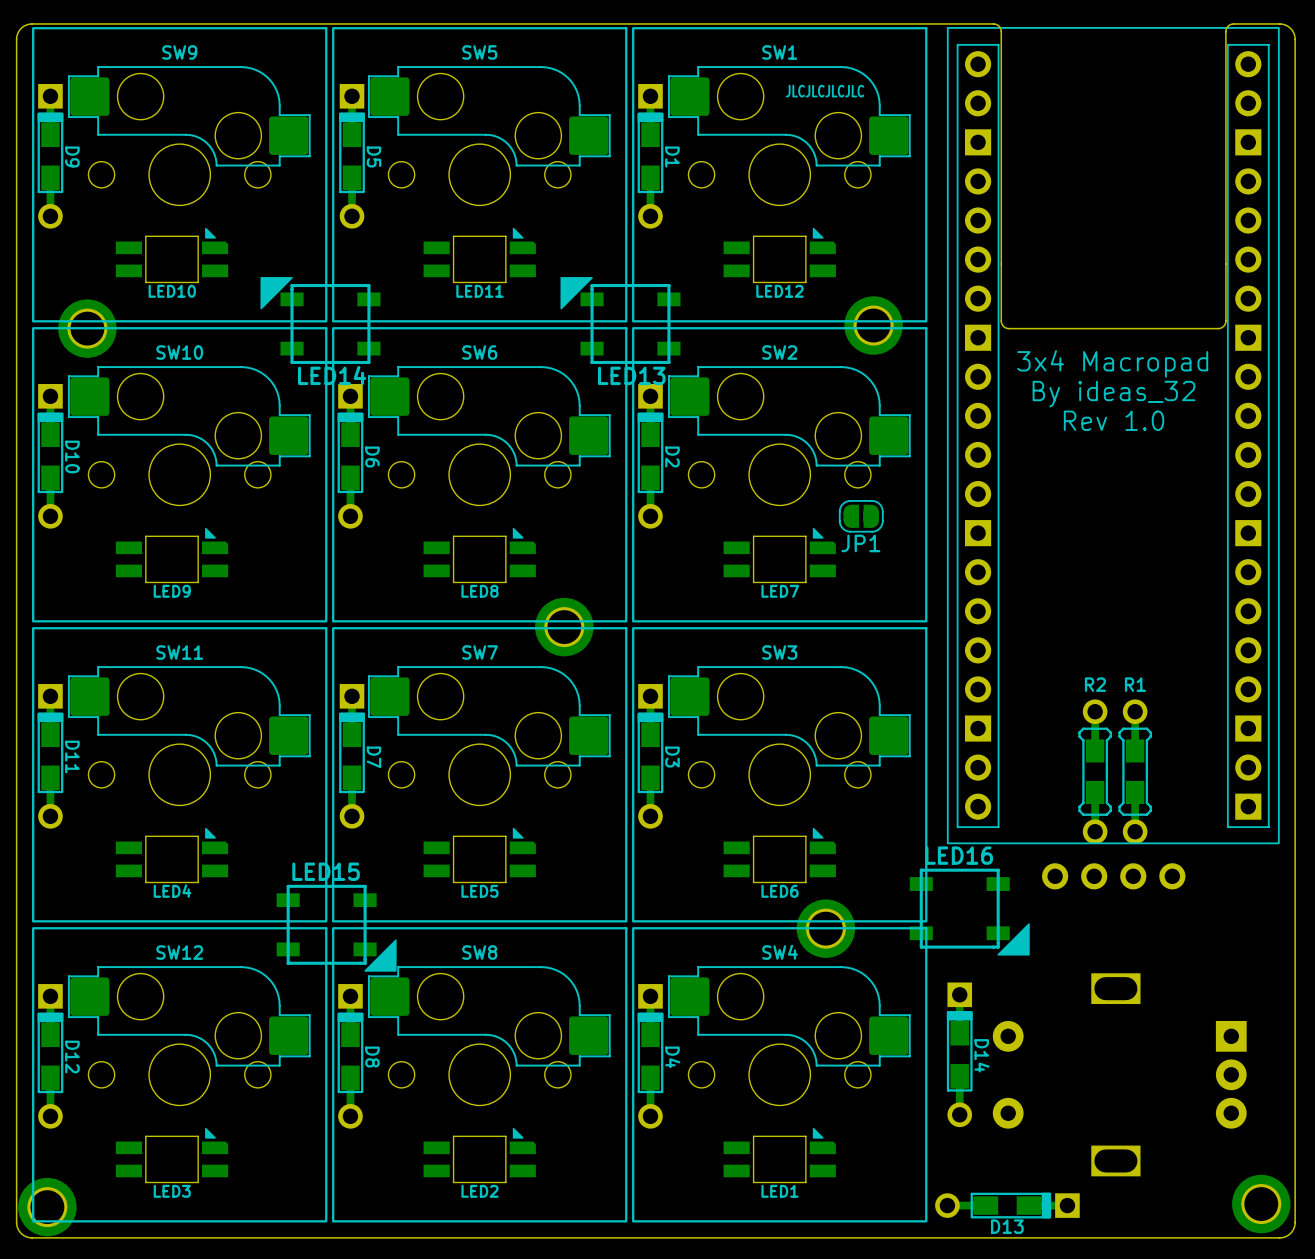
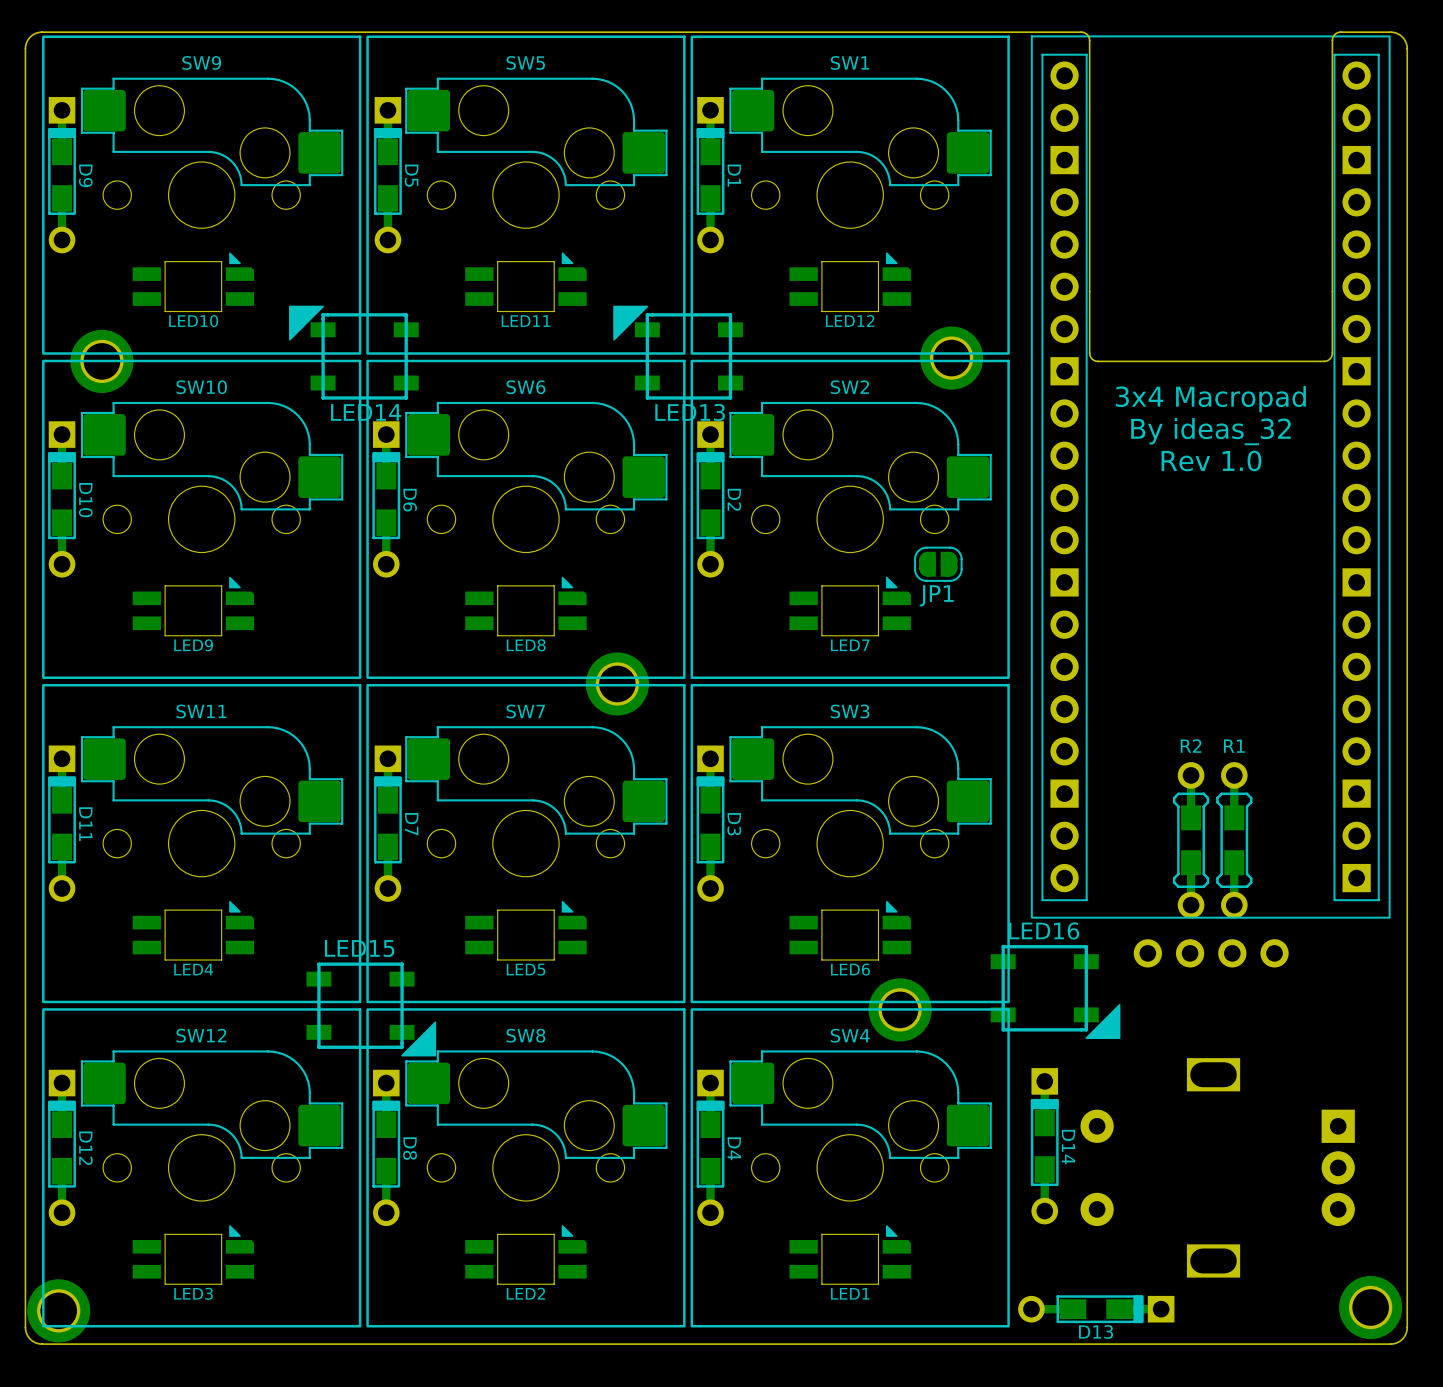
text: JLCJLCJLCJLC (824, 91) -> none

